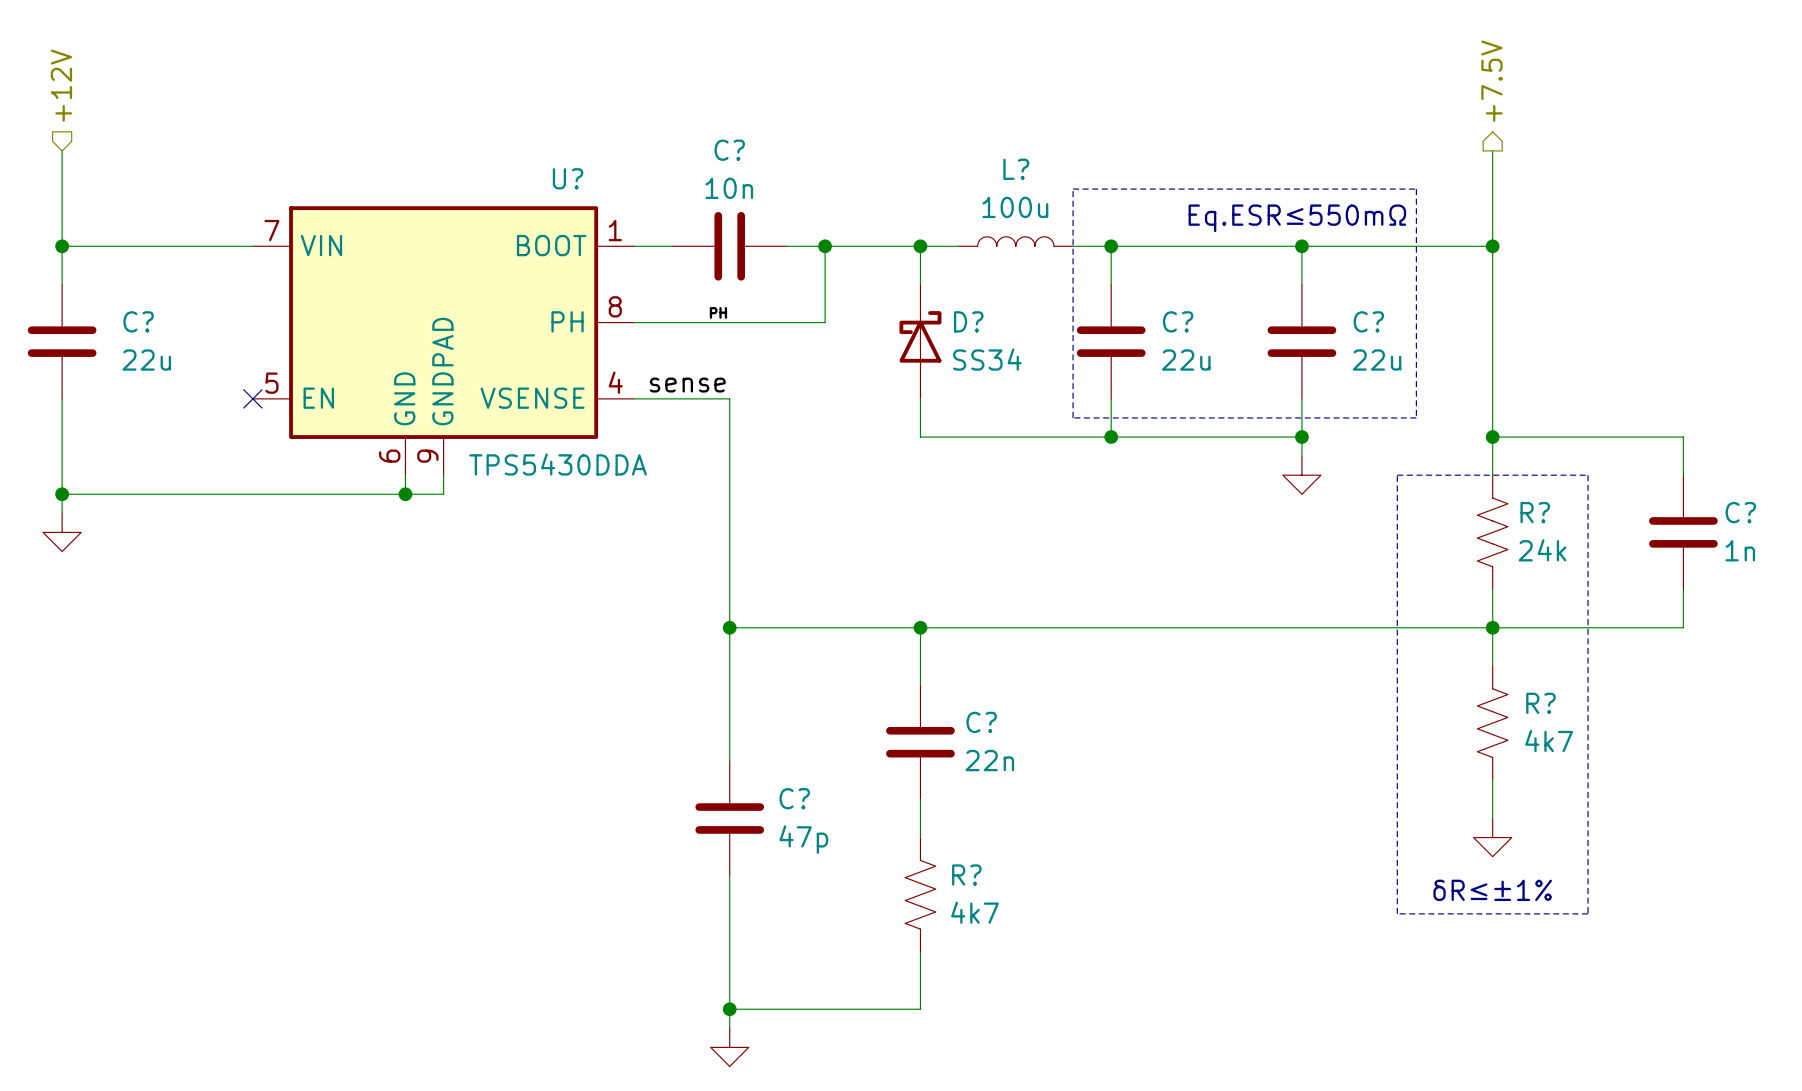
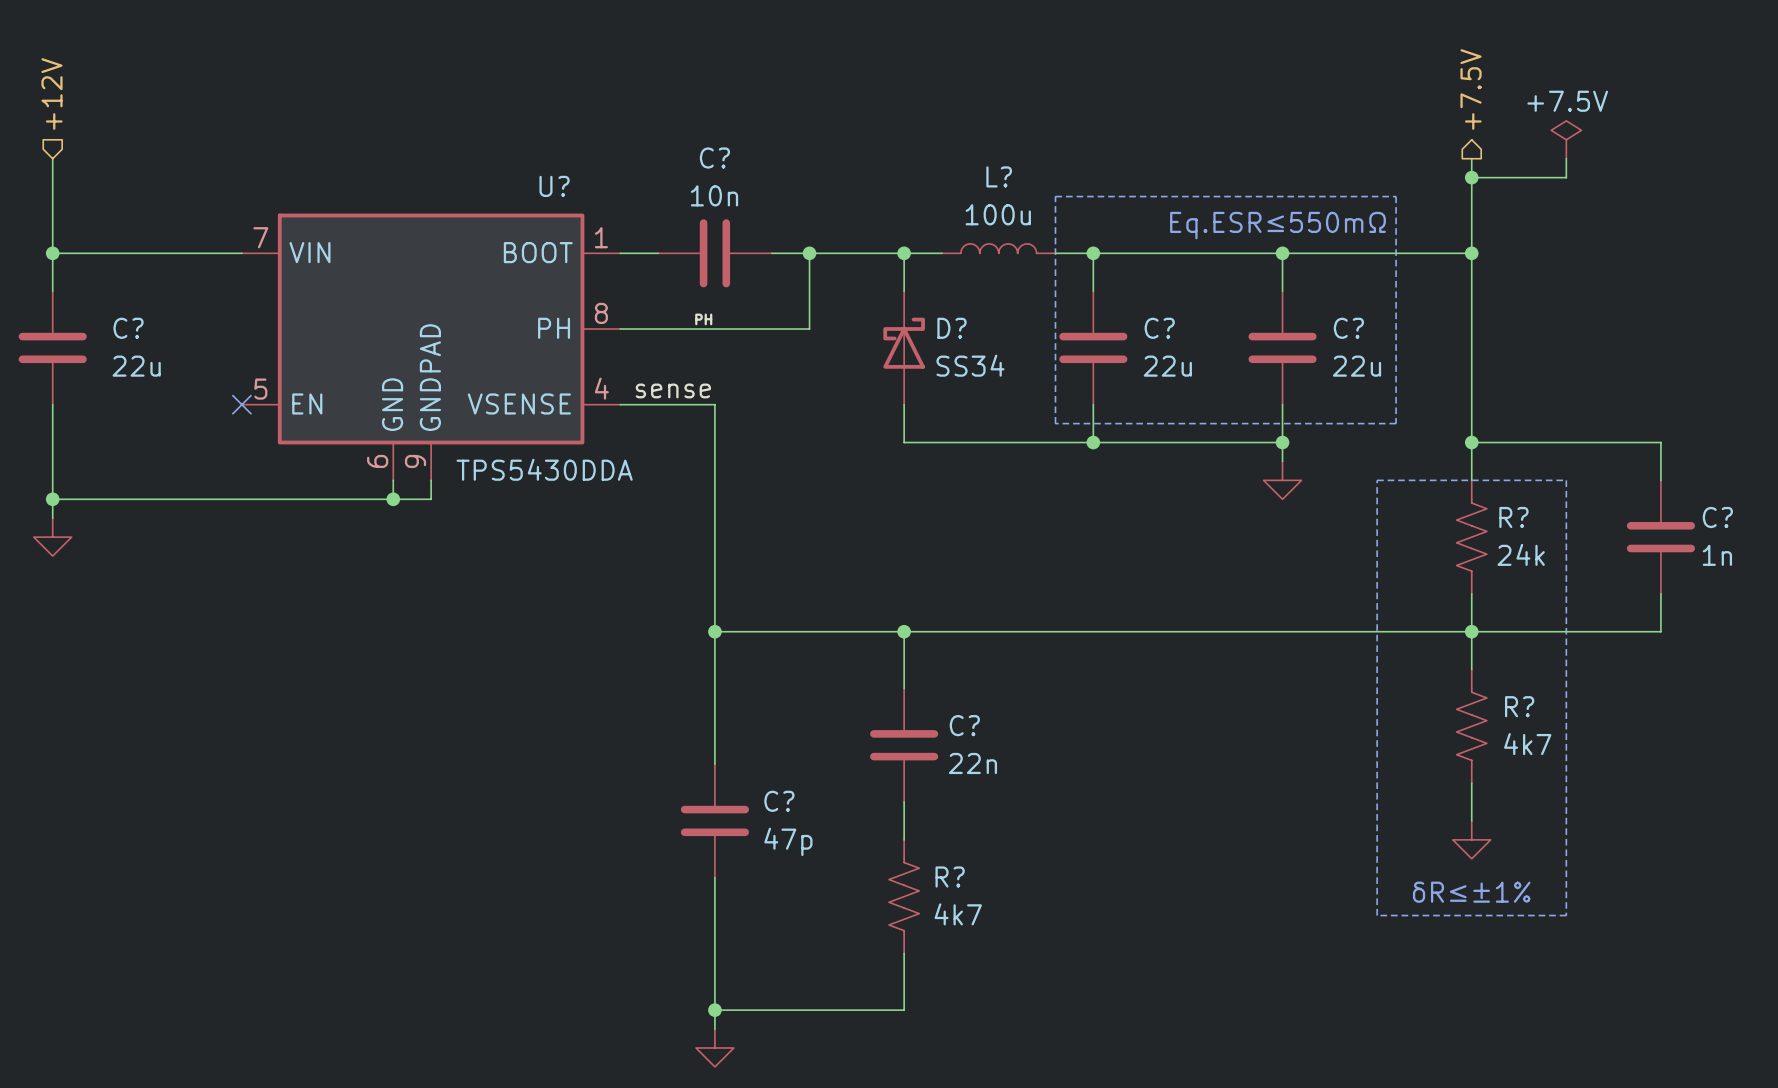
power symbol: none -> +7.5V (1566, 139)
wire: none -> (1566, 158) (1566, 177) (1471, 177)
junction: none -> (1471, 177)

